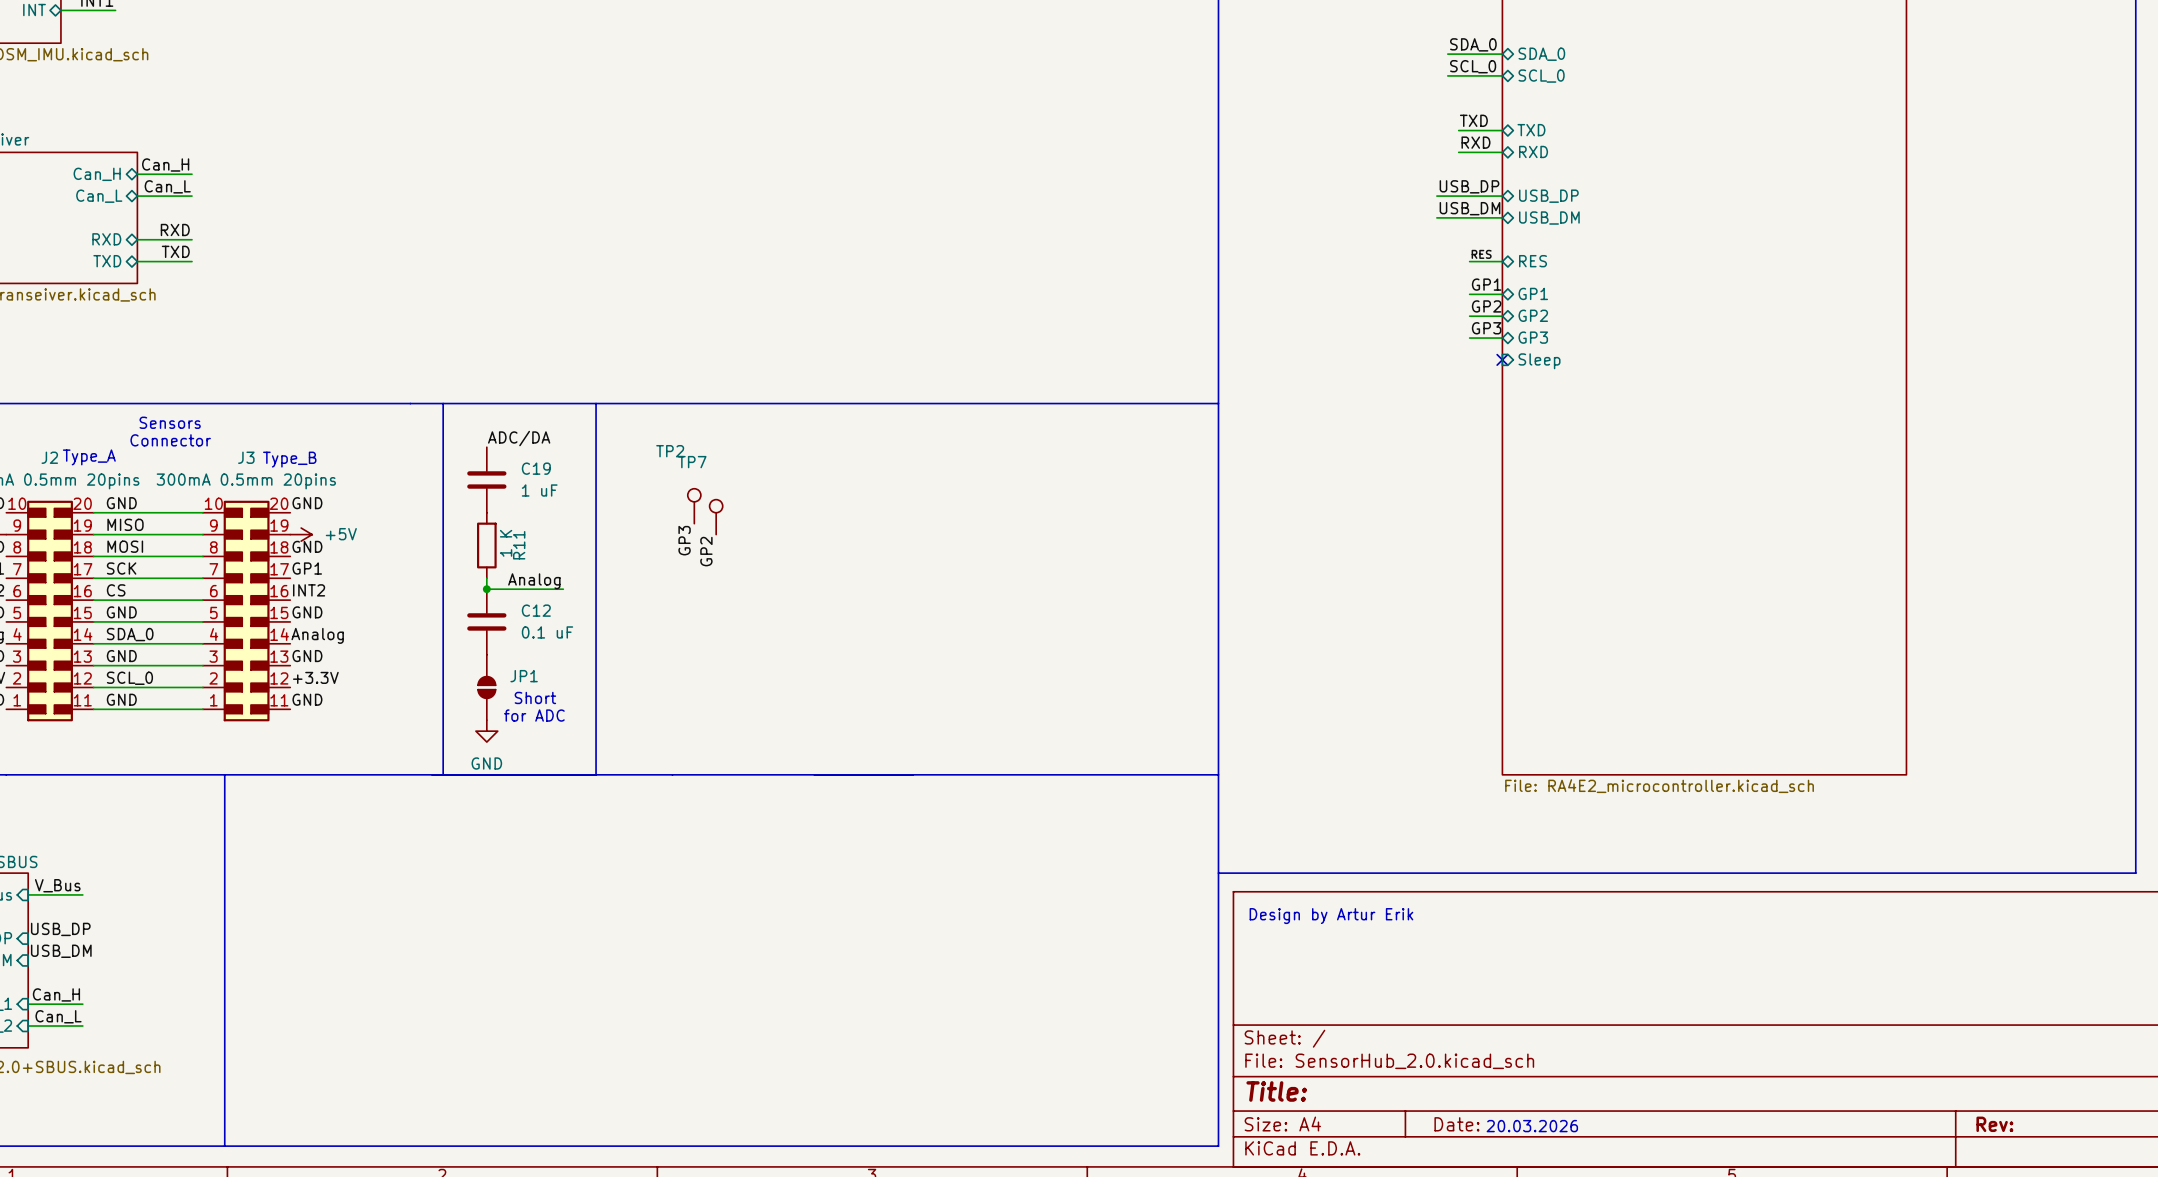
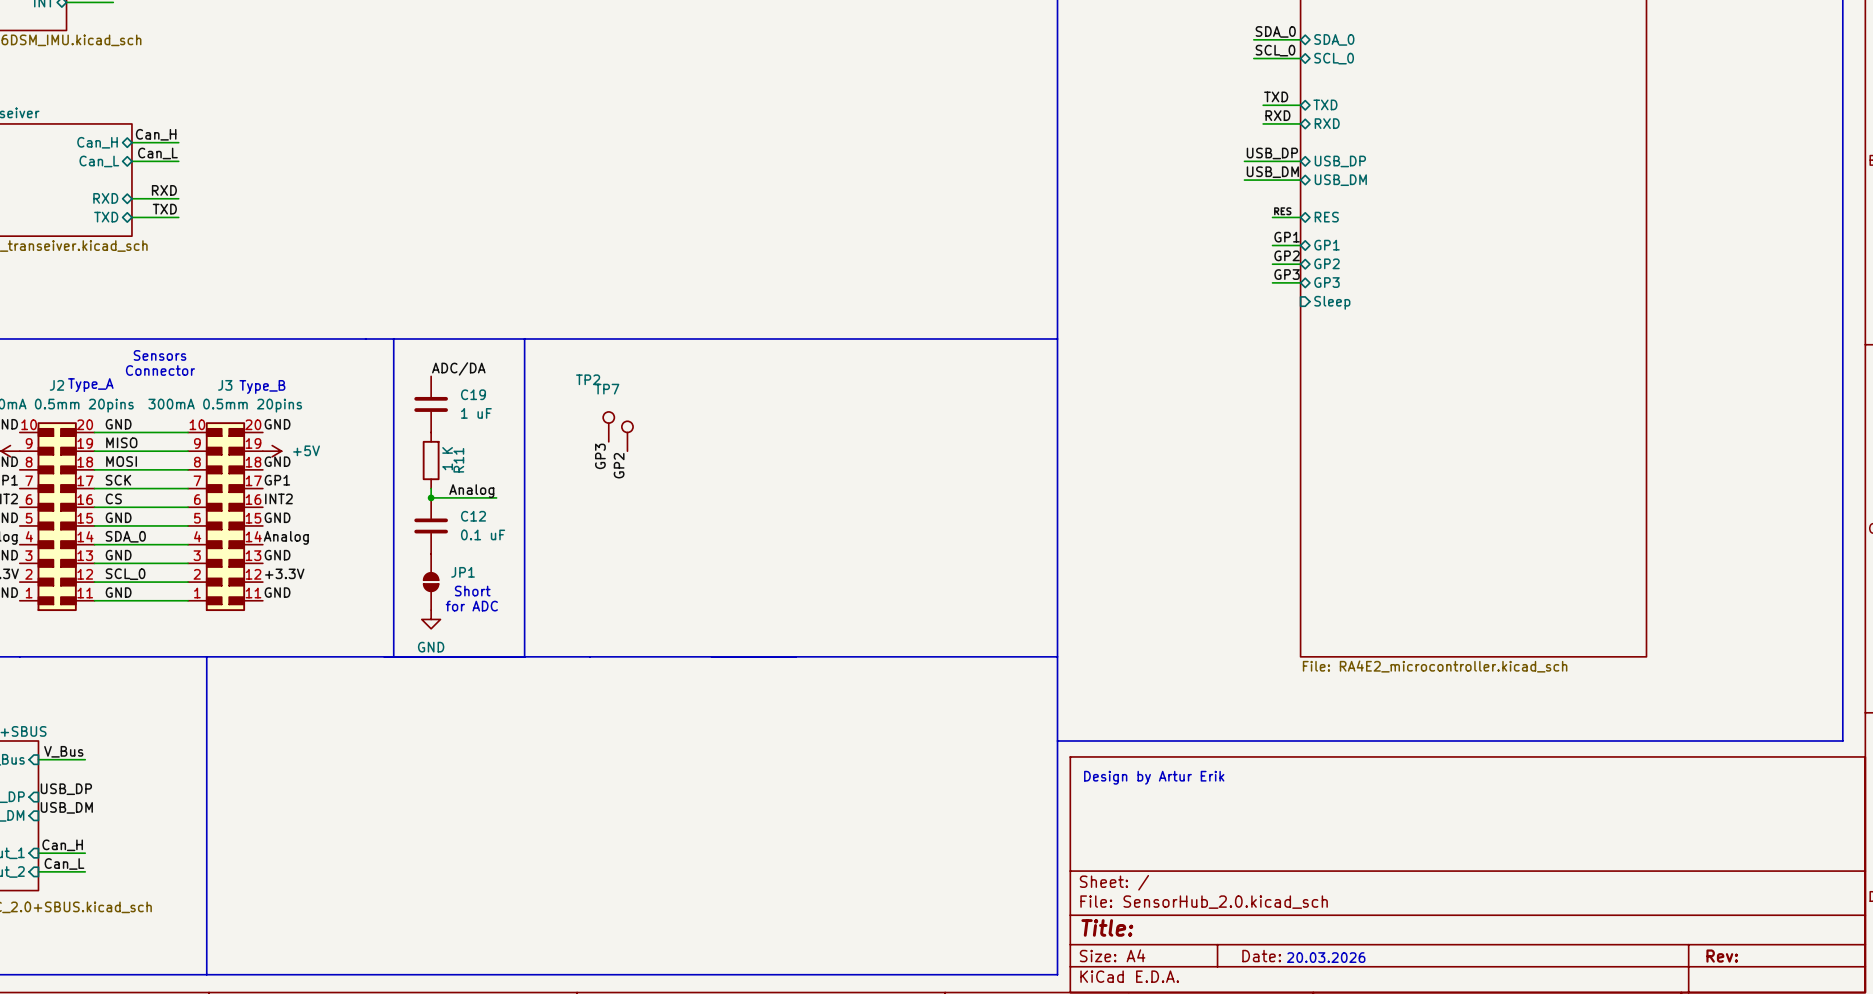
no-connect mark: (1502, 359) -> none

